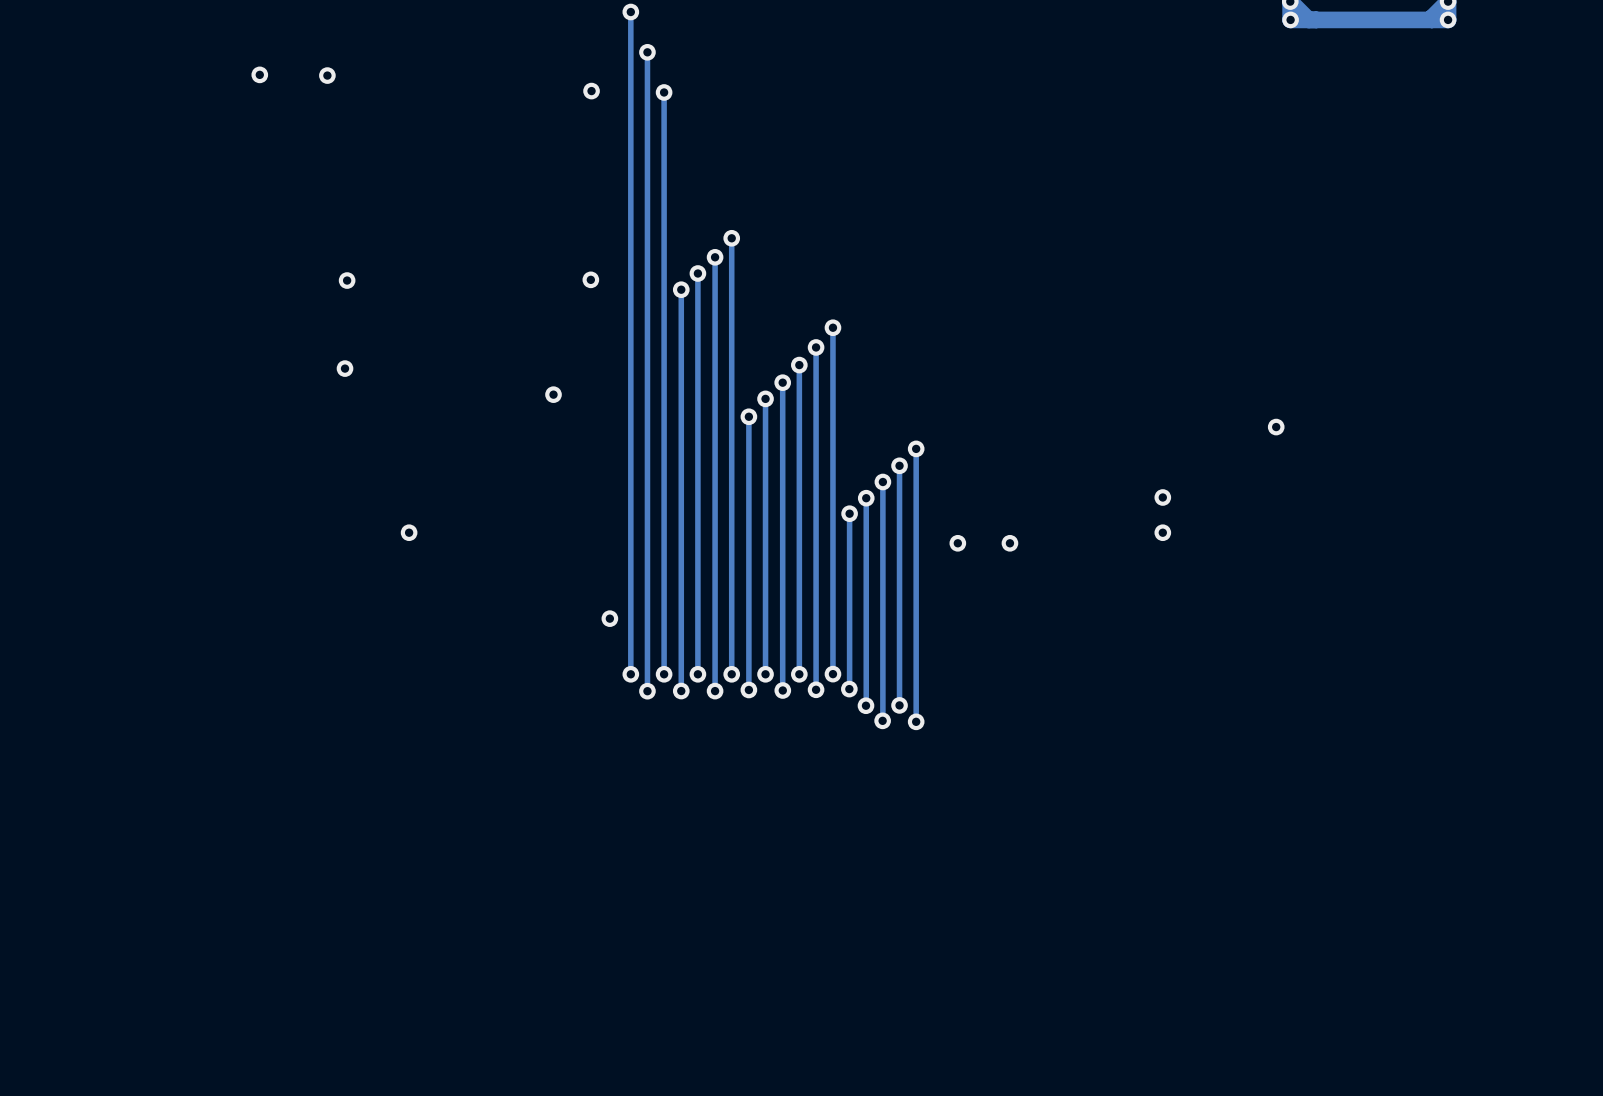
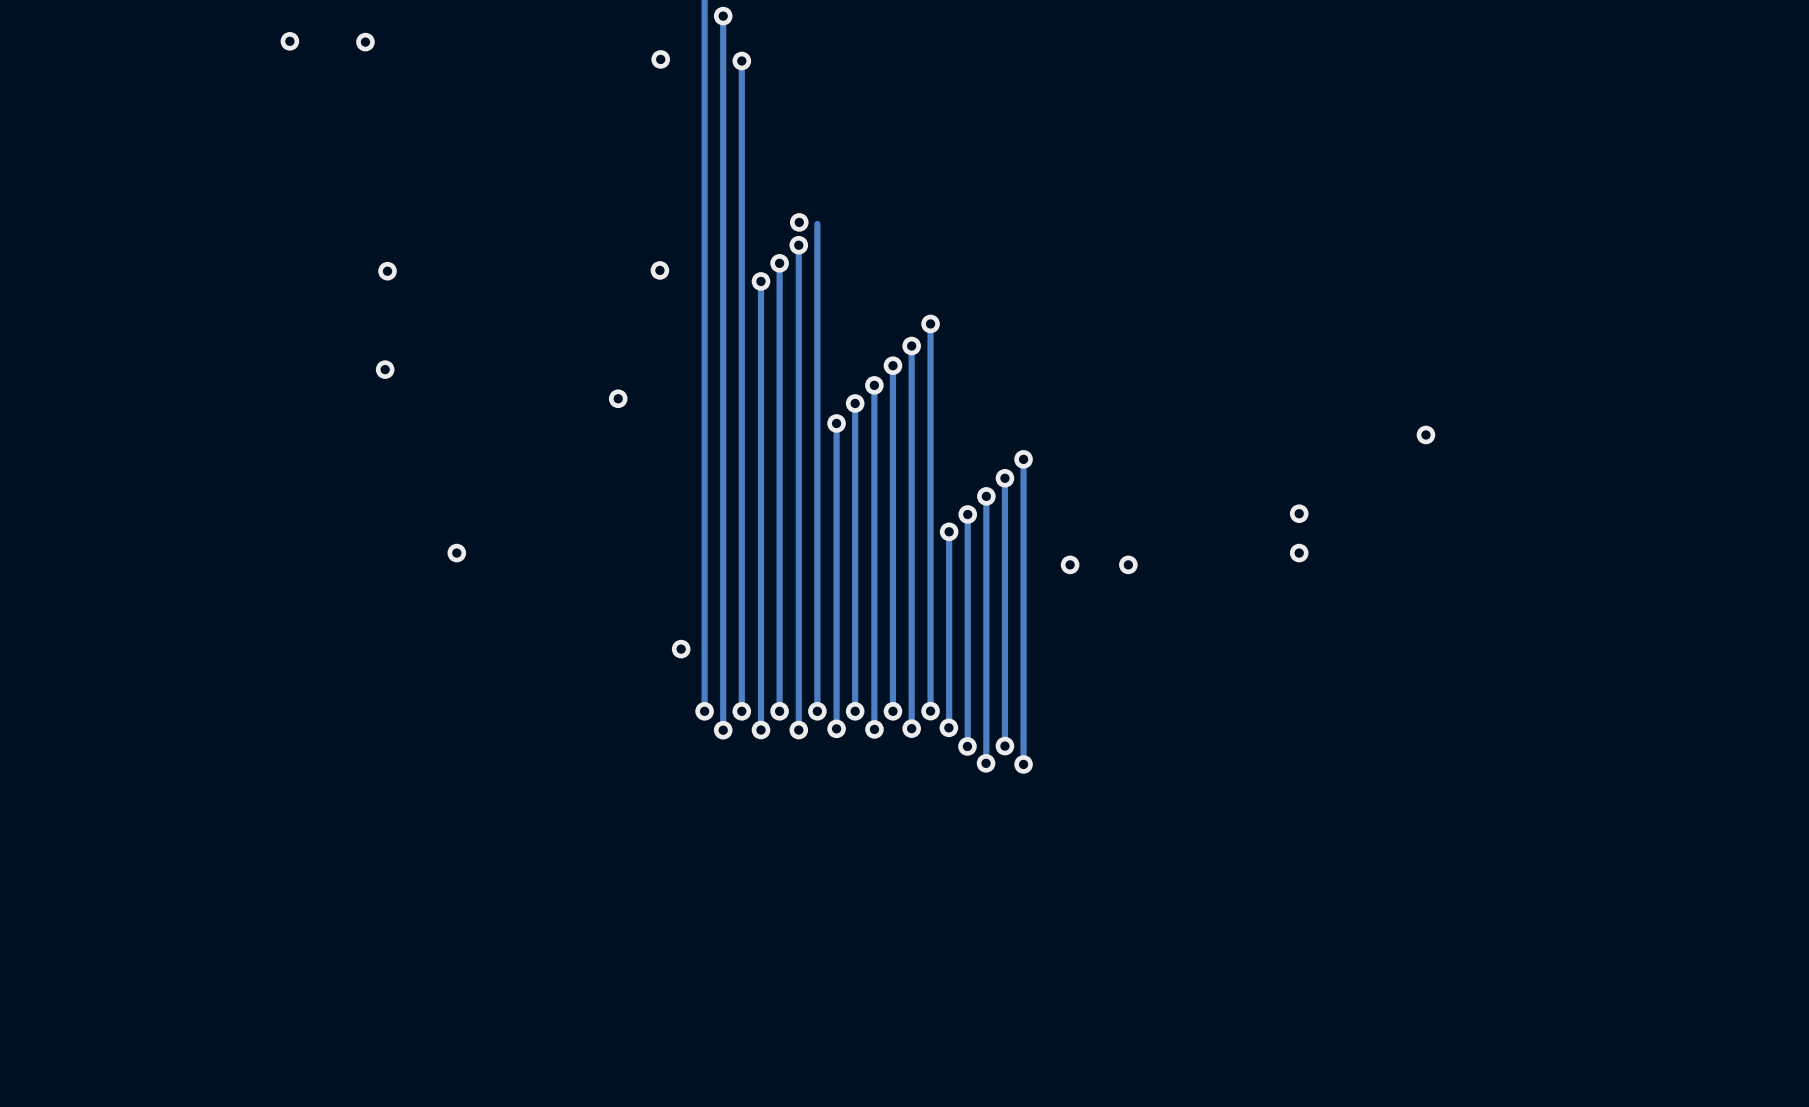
via position: (731, 238) -> (799, 222)

